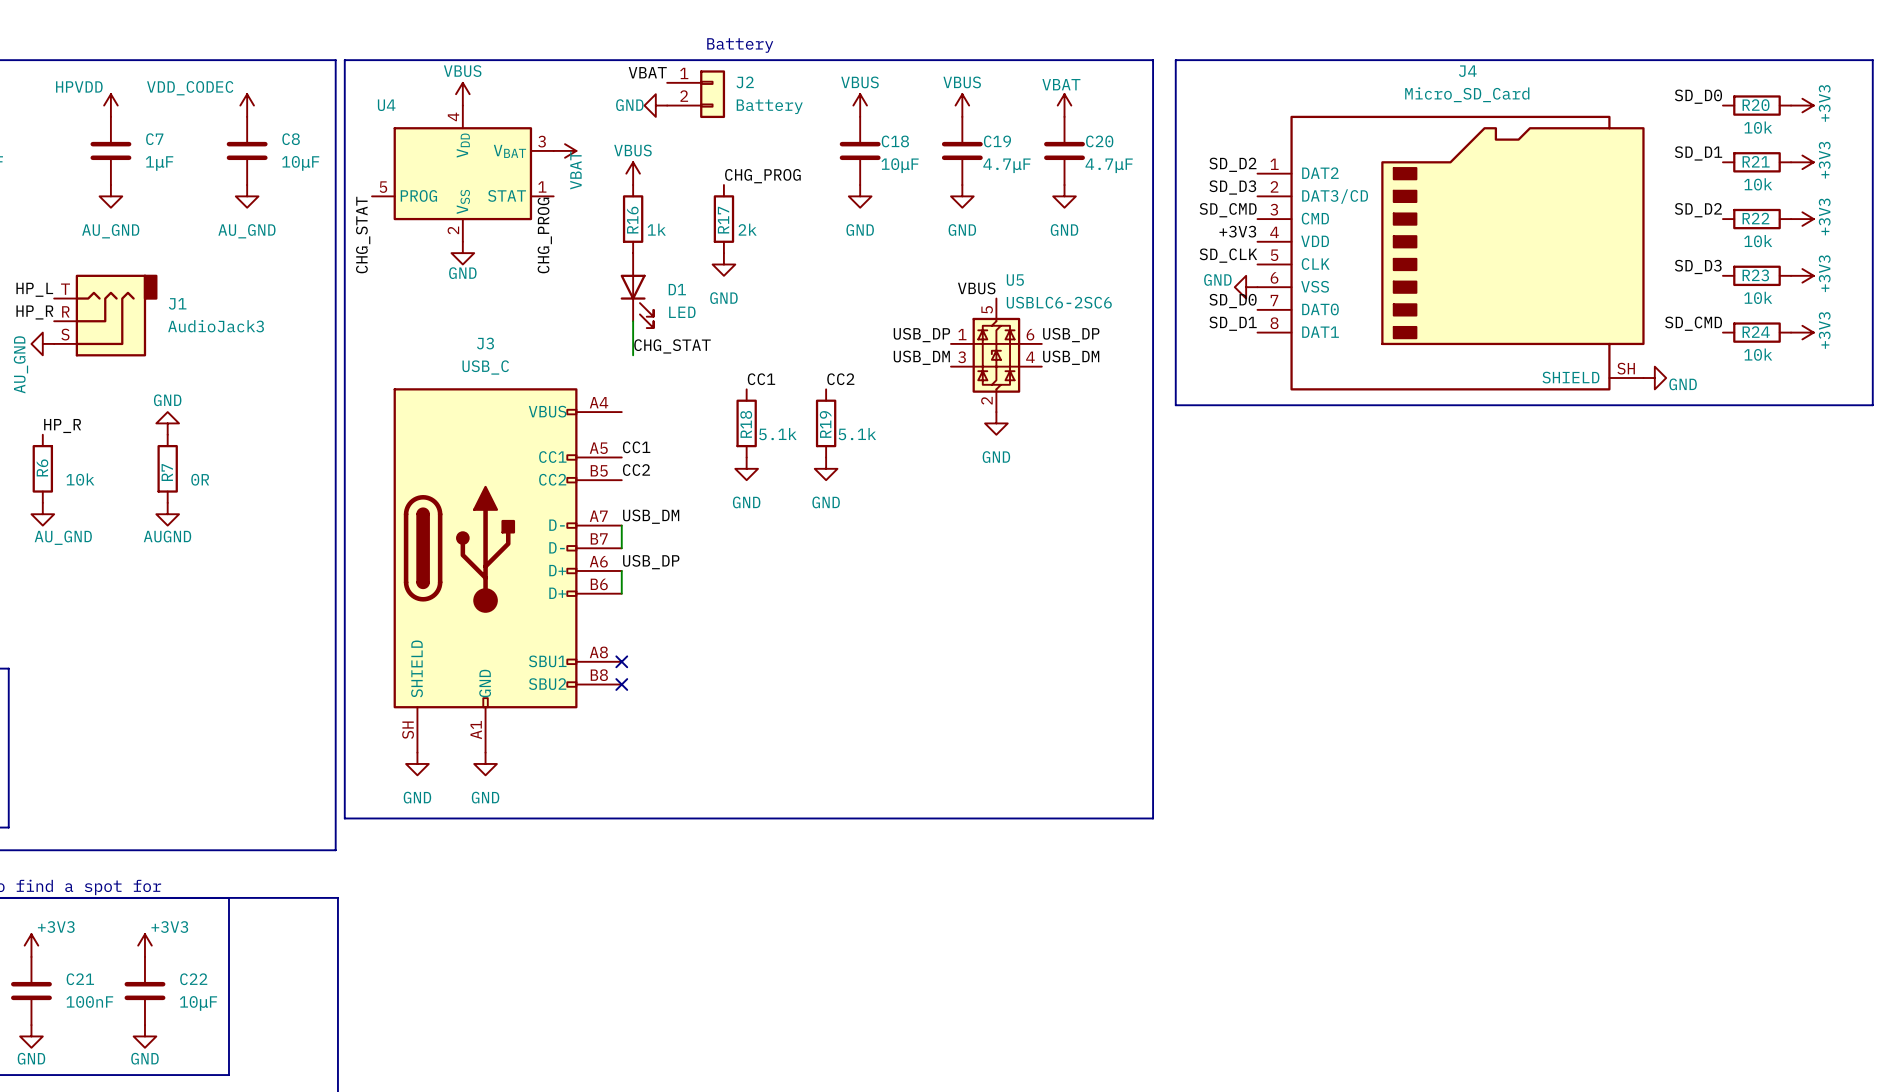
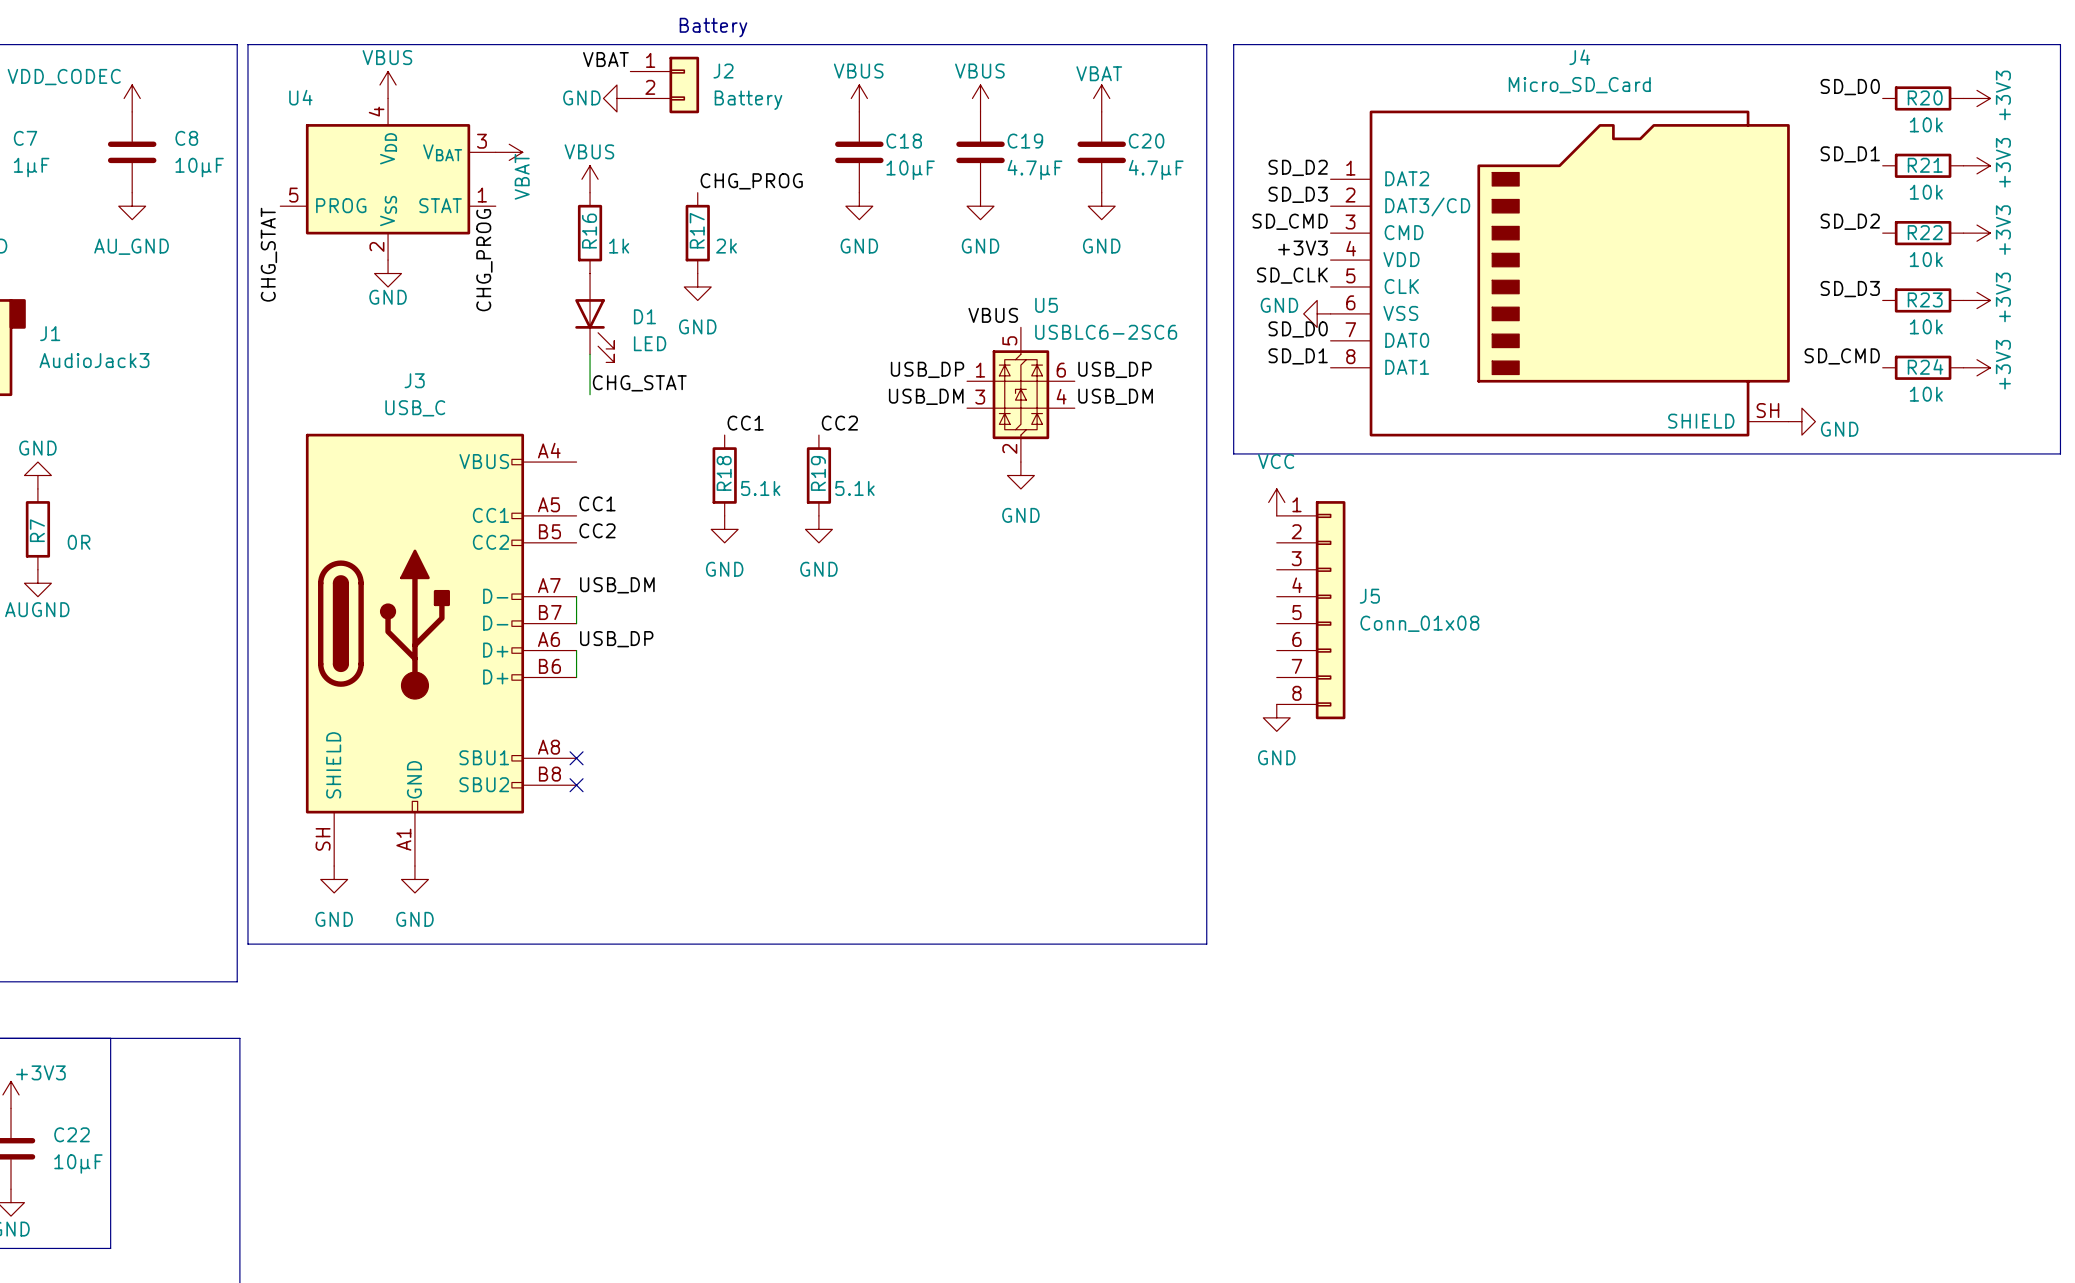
power symbol: none -> VCC (1276, 502)
J5: none -> Conn_01x08 (1311, 610)
power symbol: none -> GND (1276, 717)

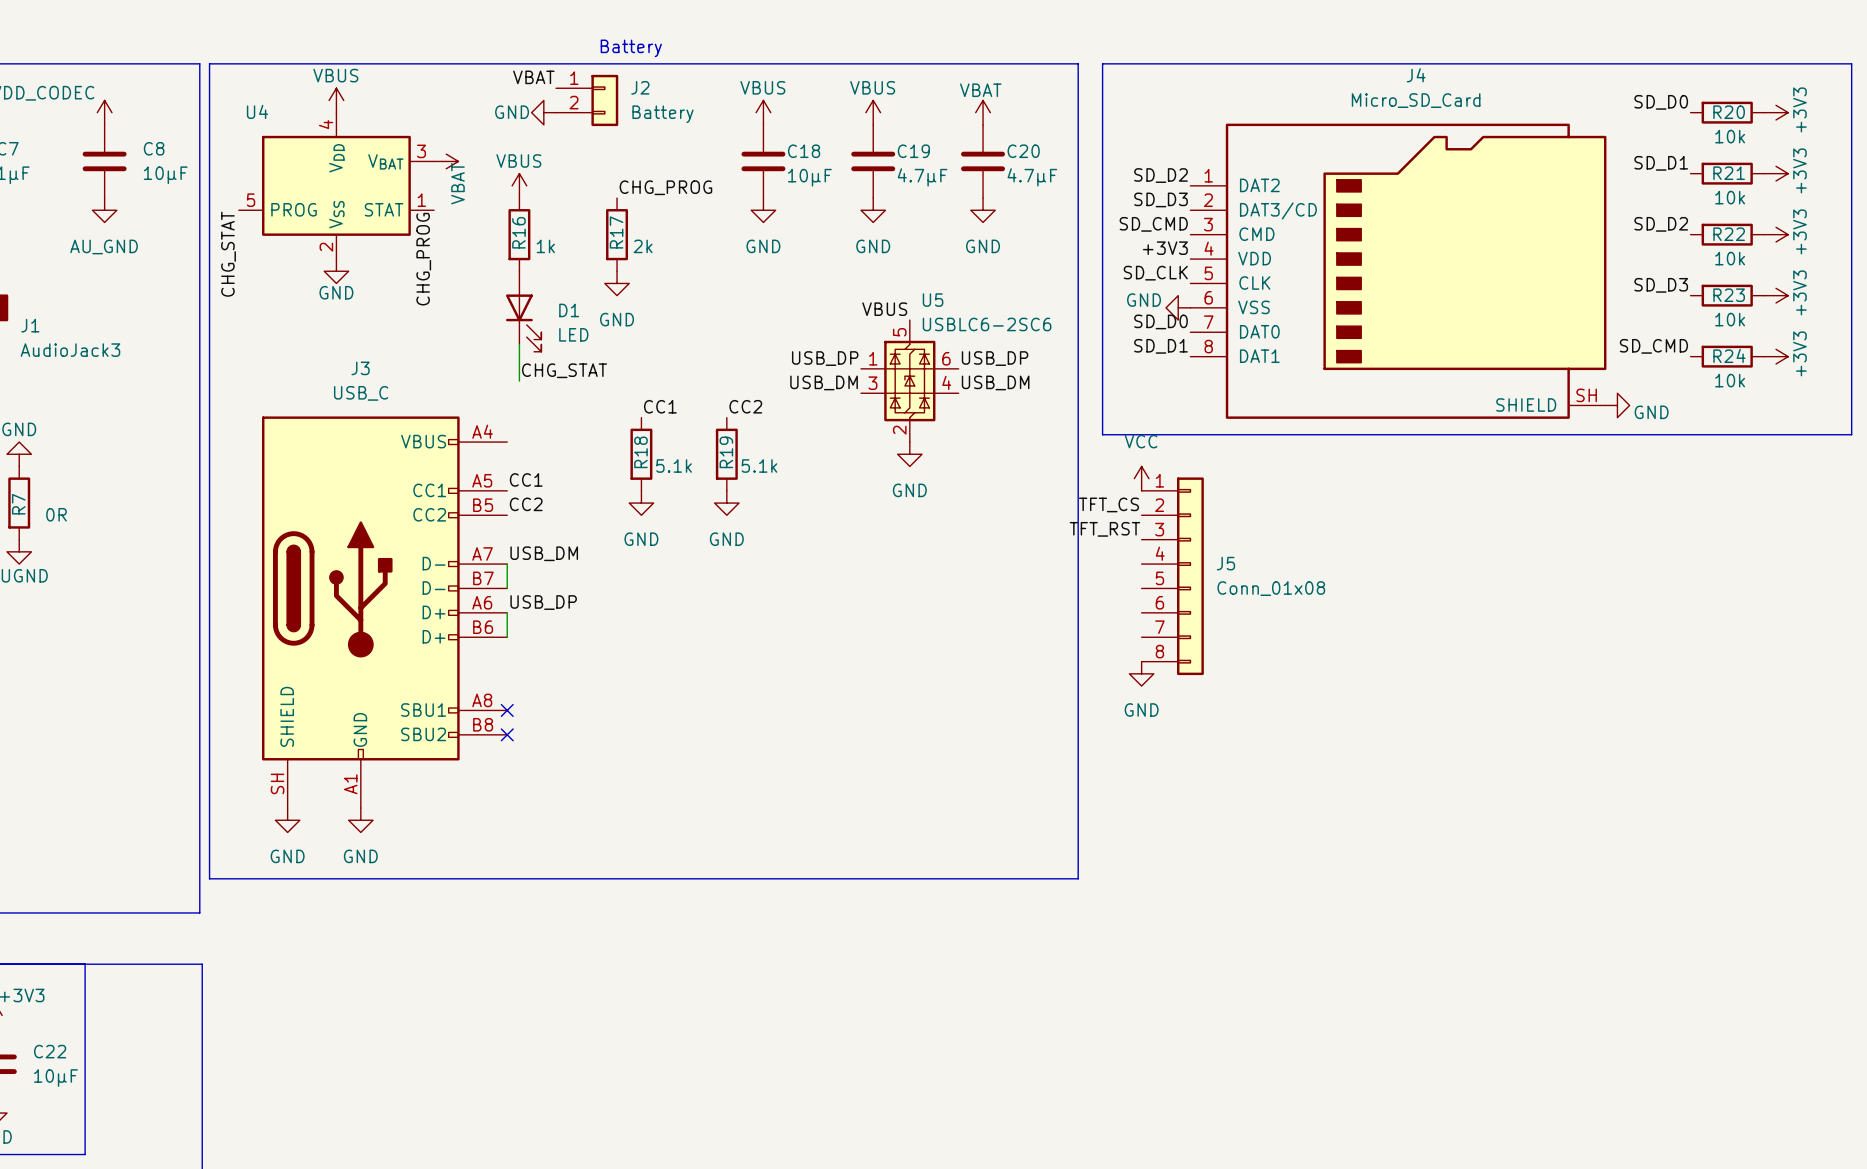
label: none -> TFT_CS (1109, 504)
label: none -> TFT_RST (1104, 529)

